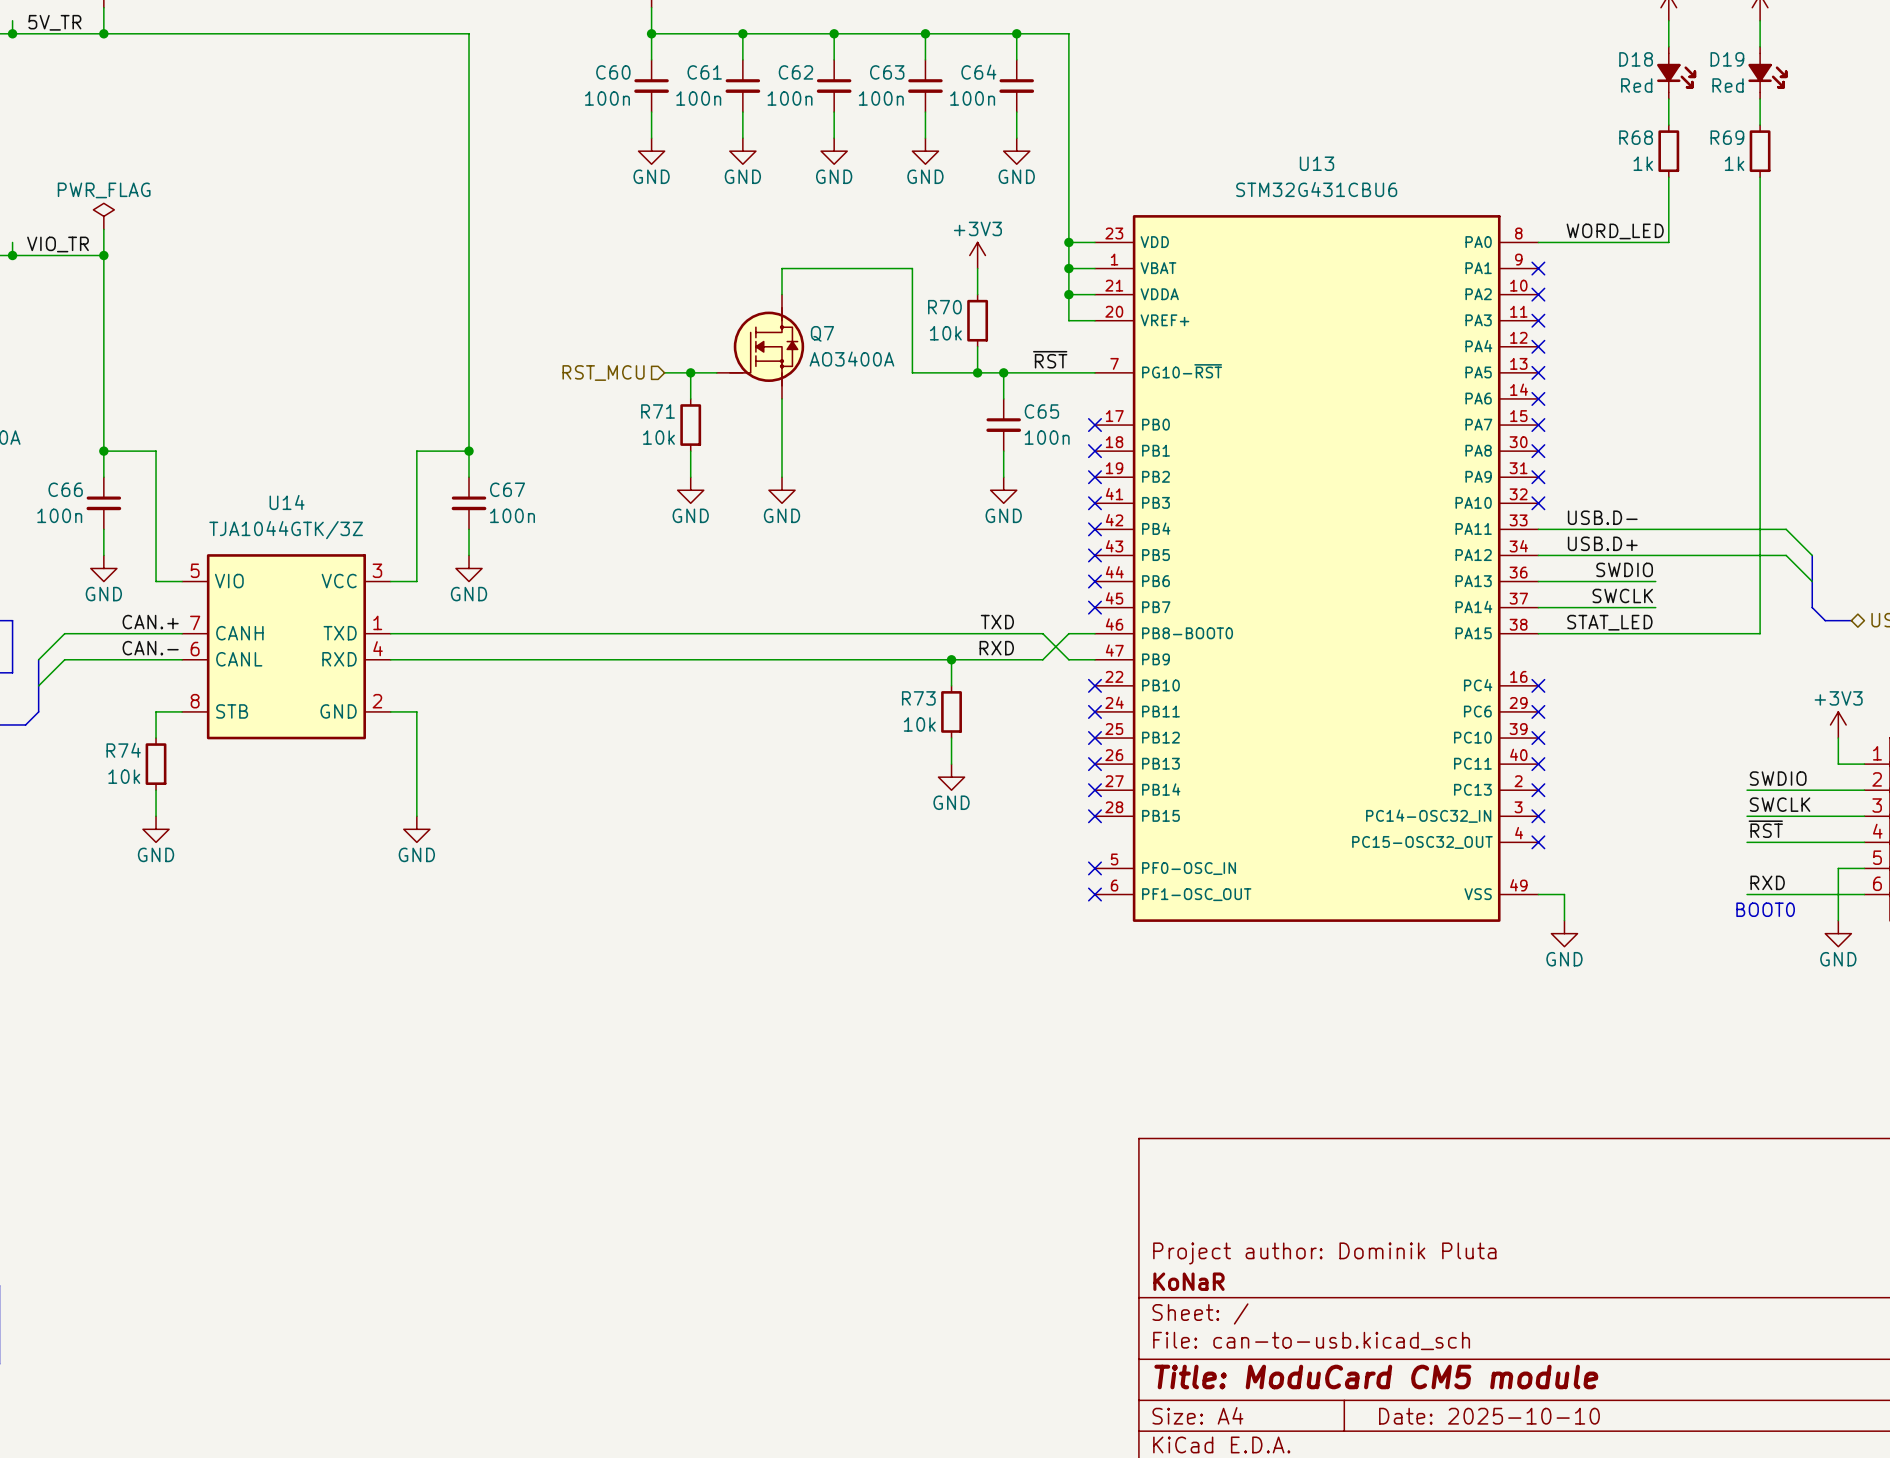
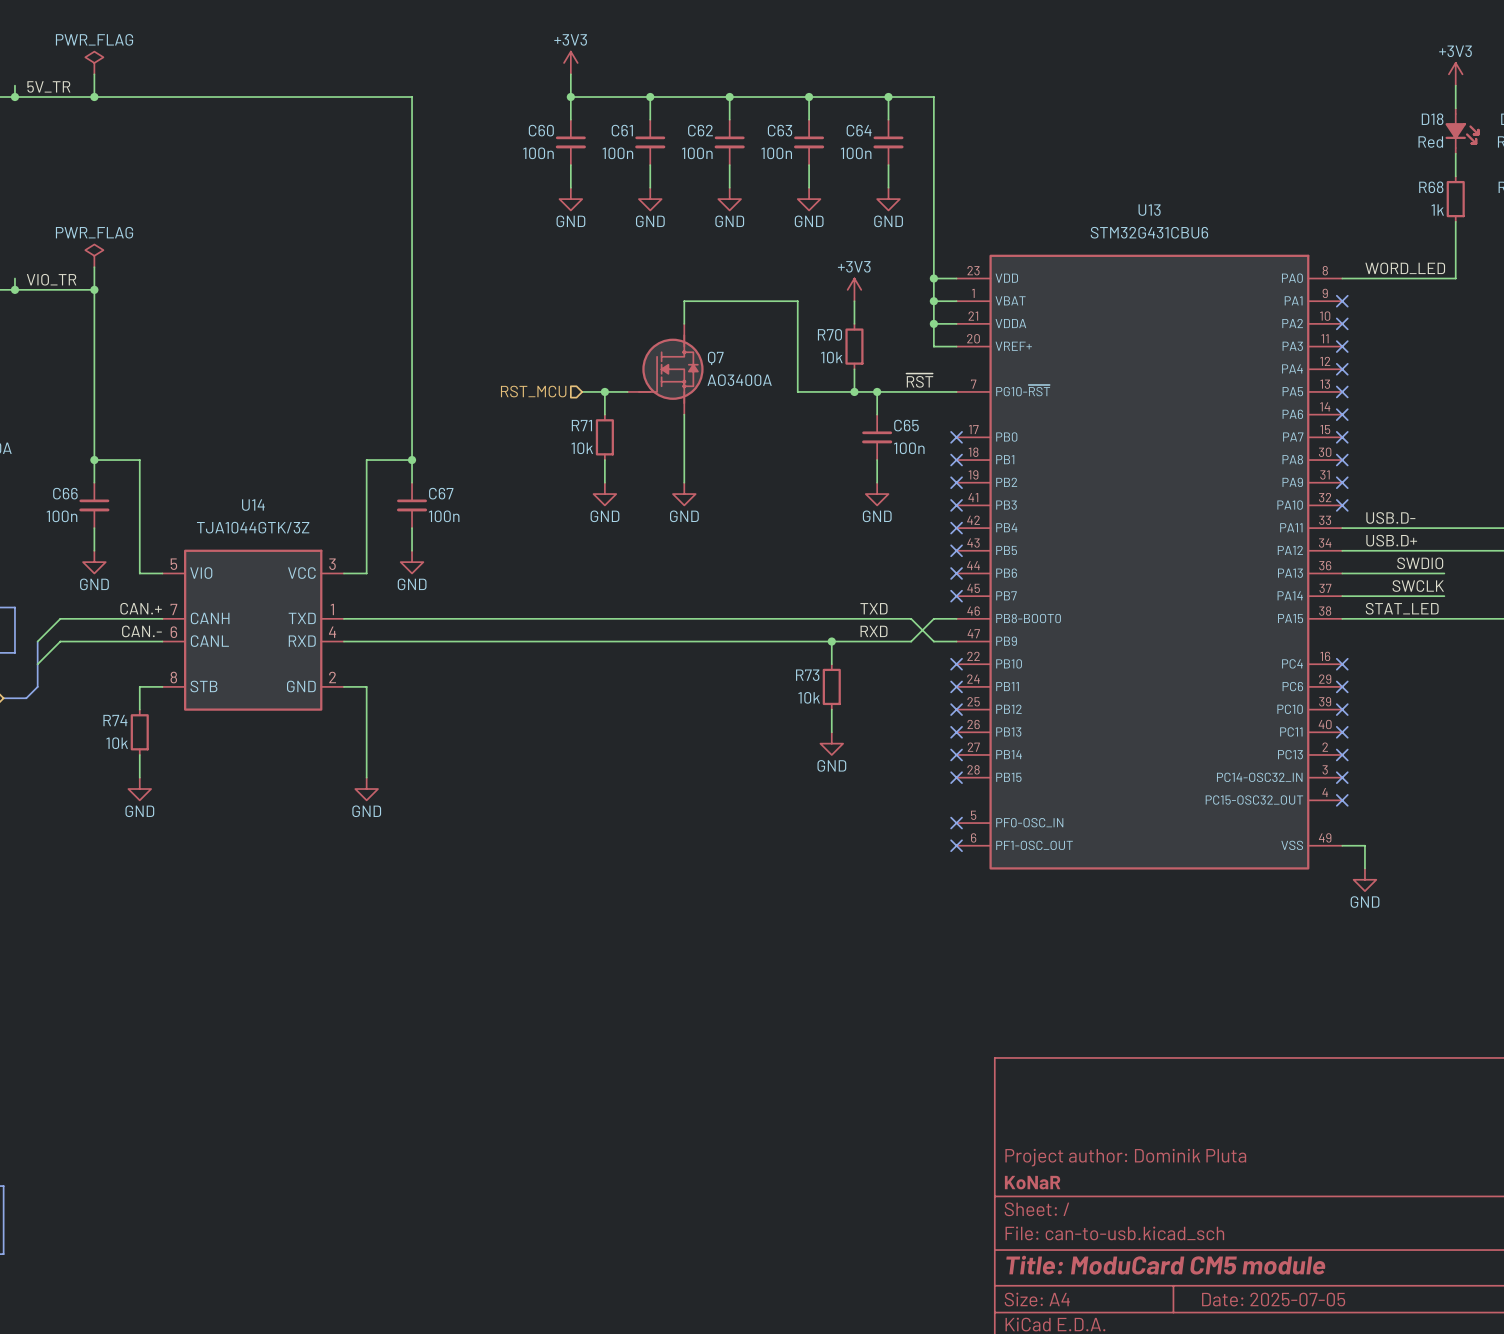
title block: Date: 2025-10-10 (1489, 1416) -> Date: 2025-07-05 (1273, 1299)

